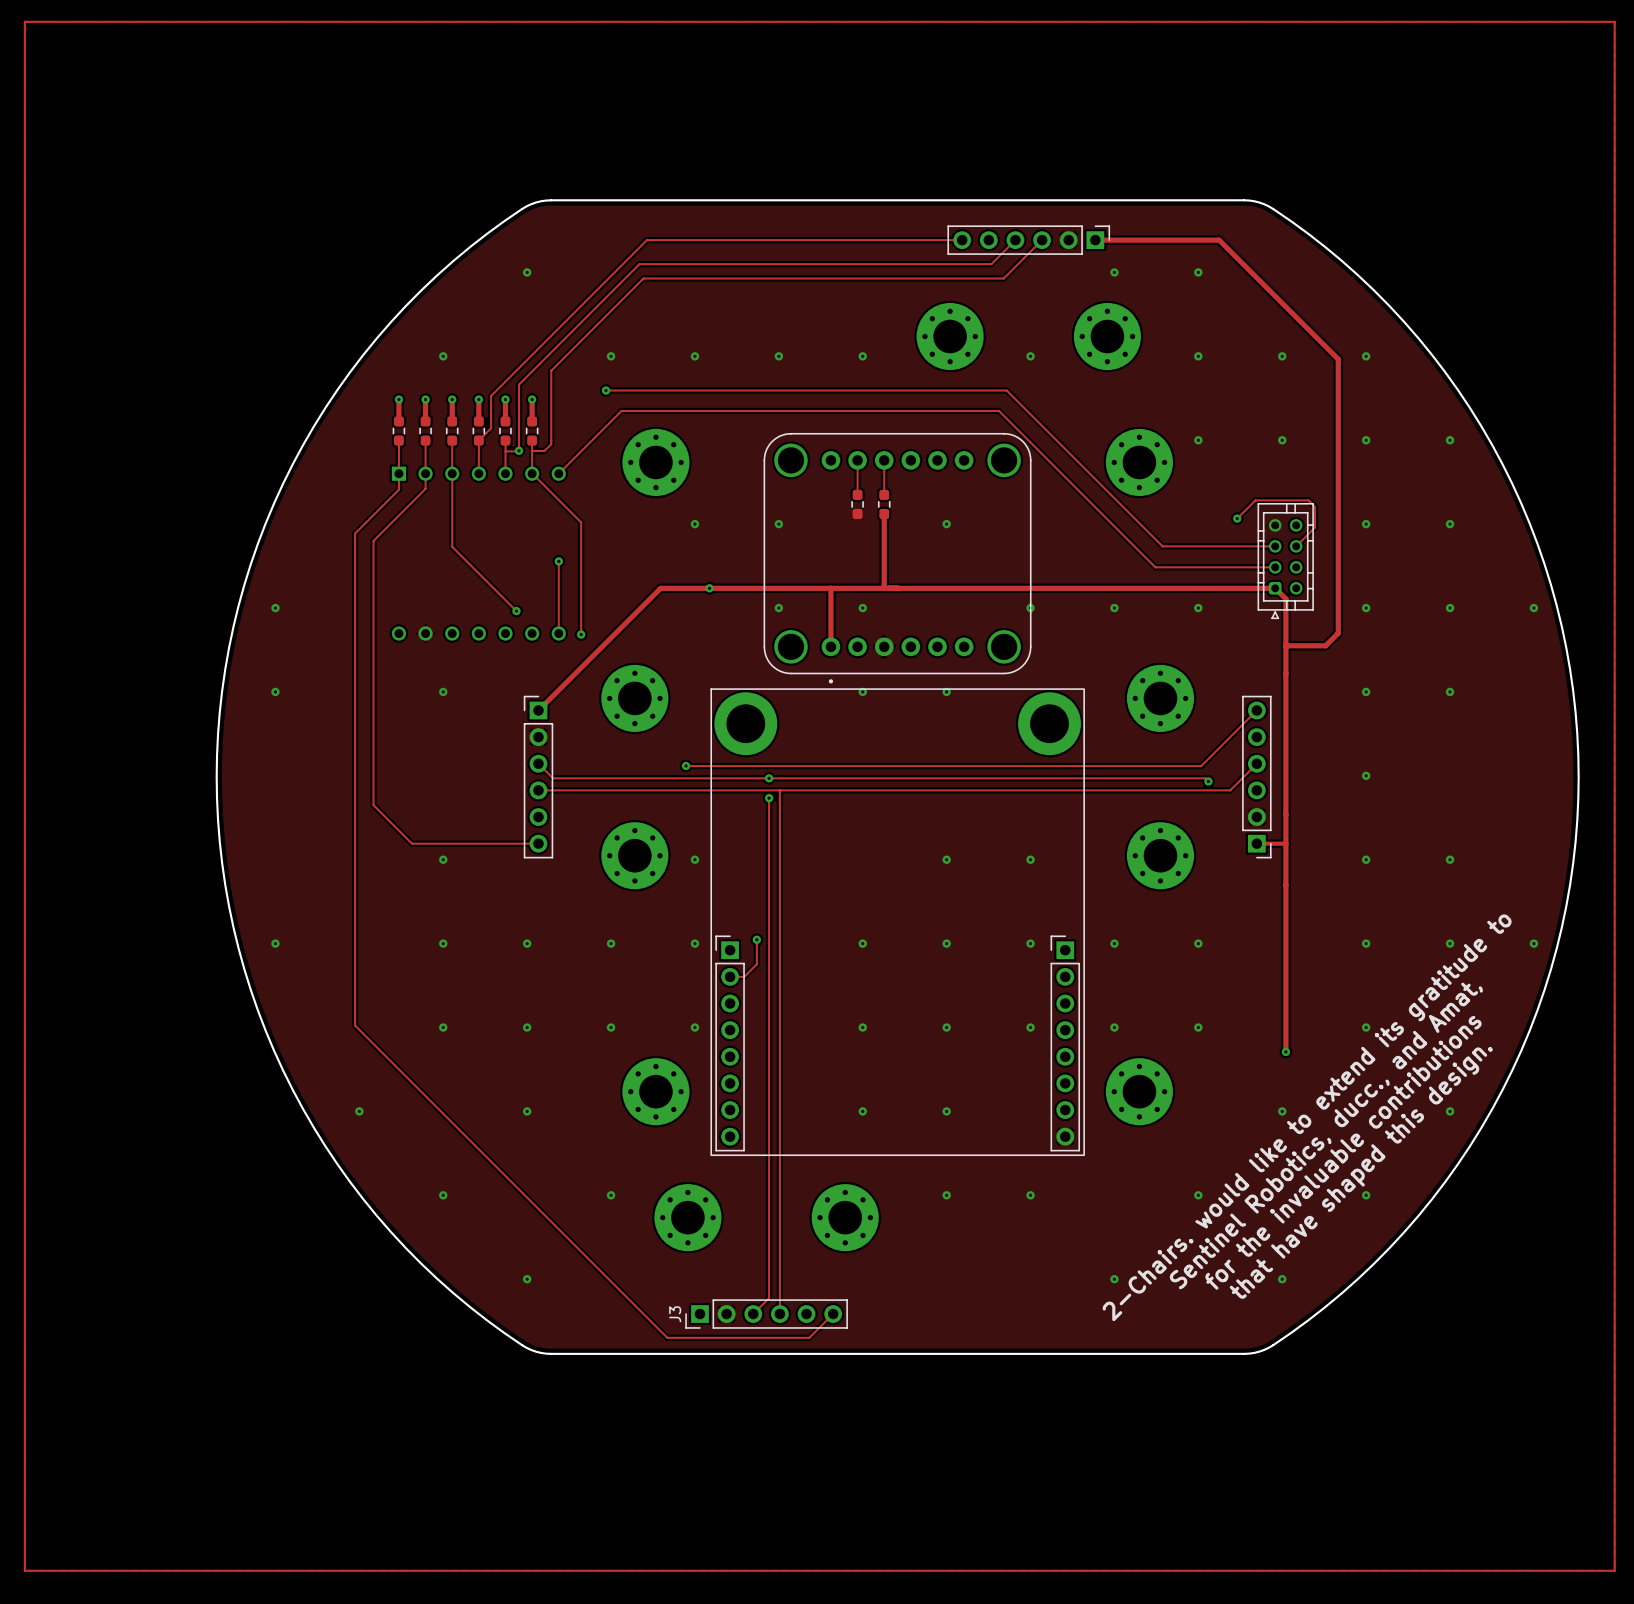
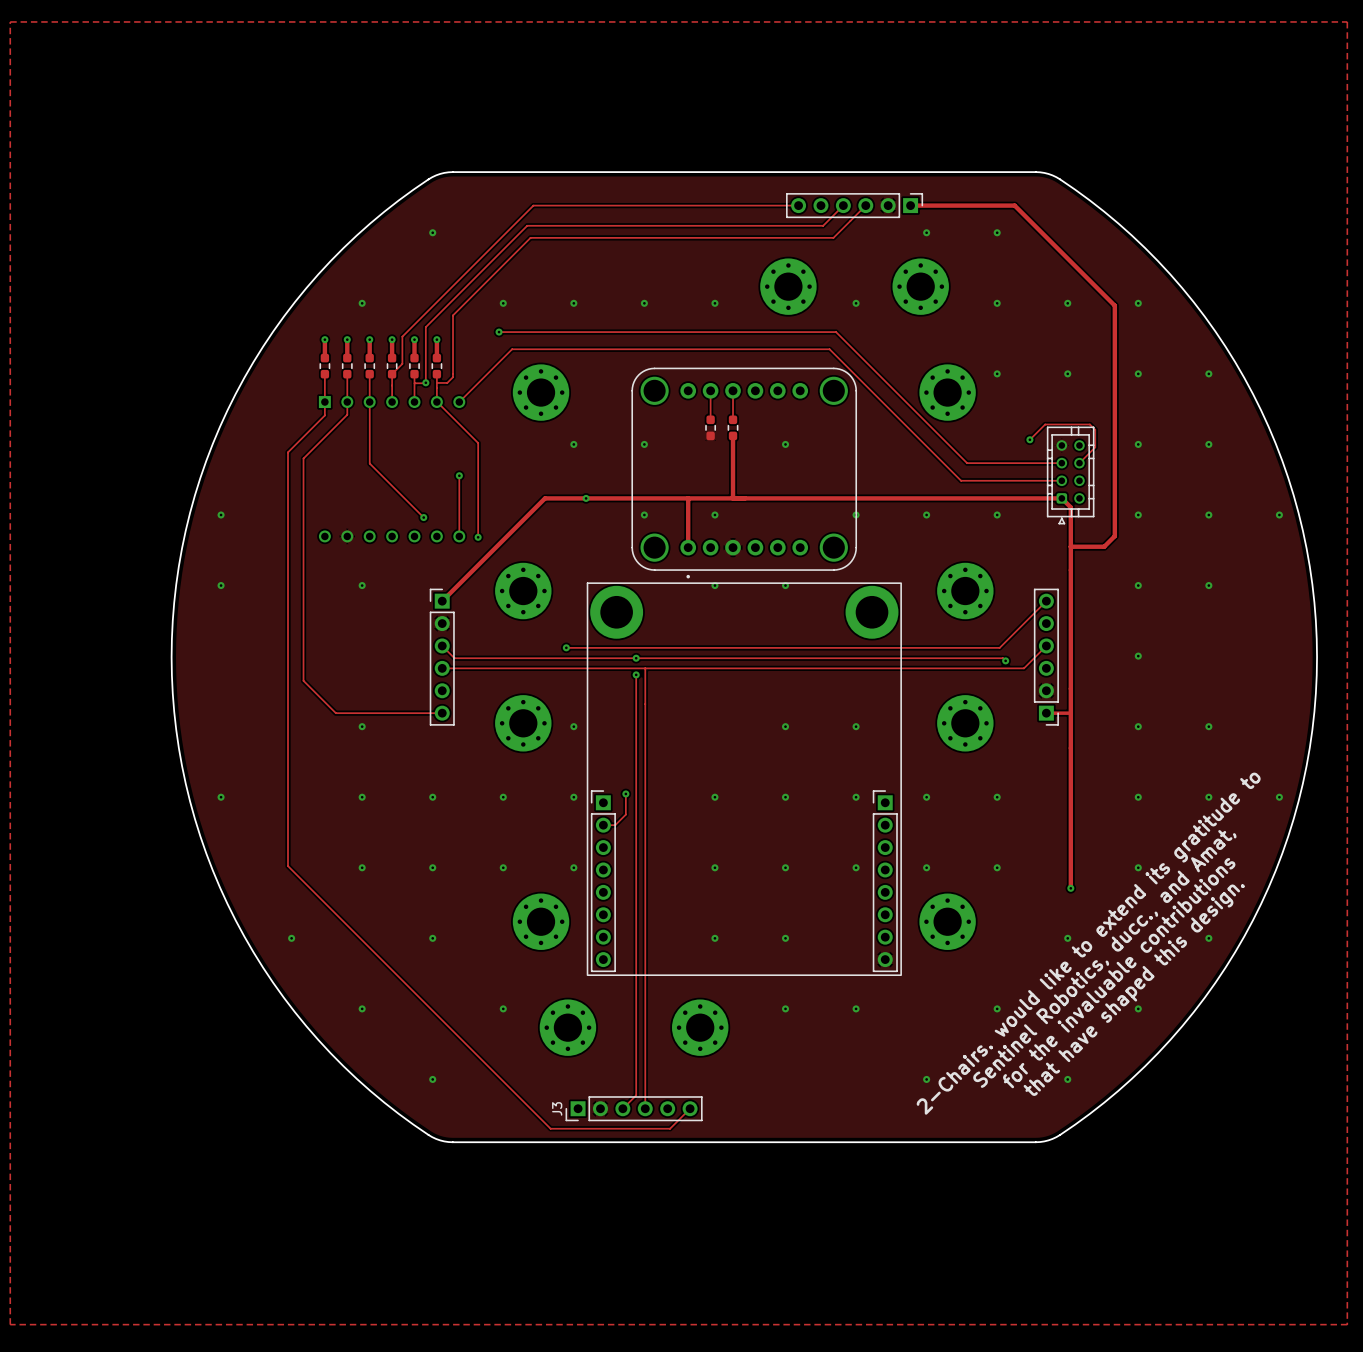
track: (24, 21) (1614, 21) (1614, 1570) (24, 1570) (24, 21) -> none

